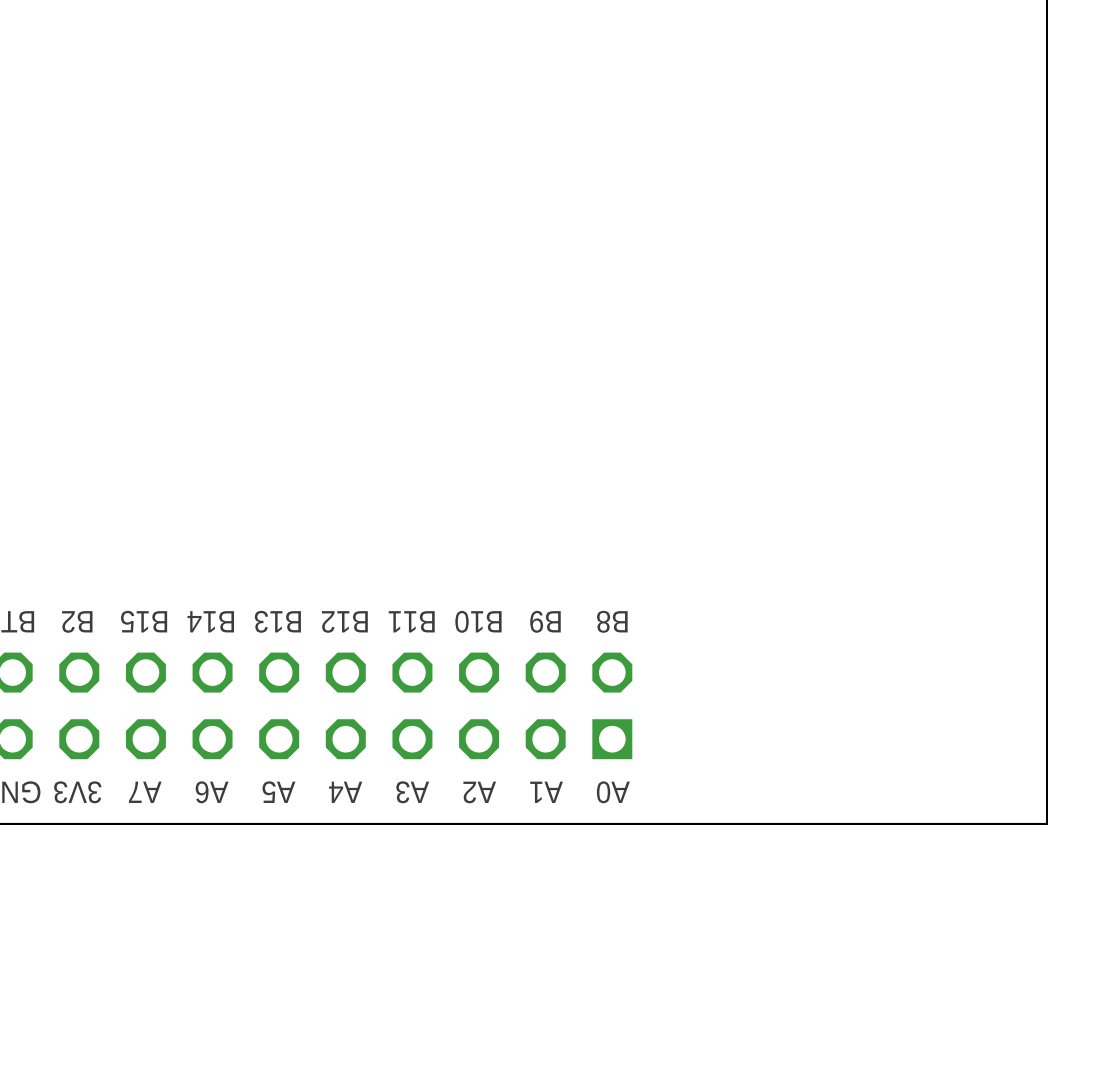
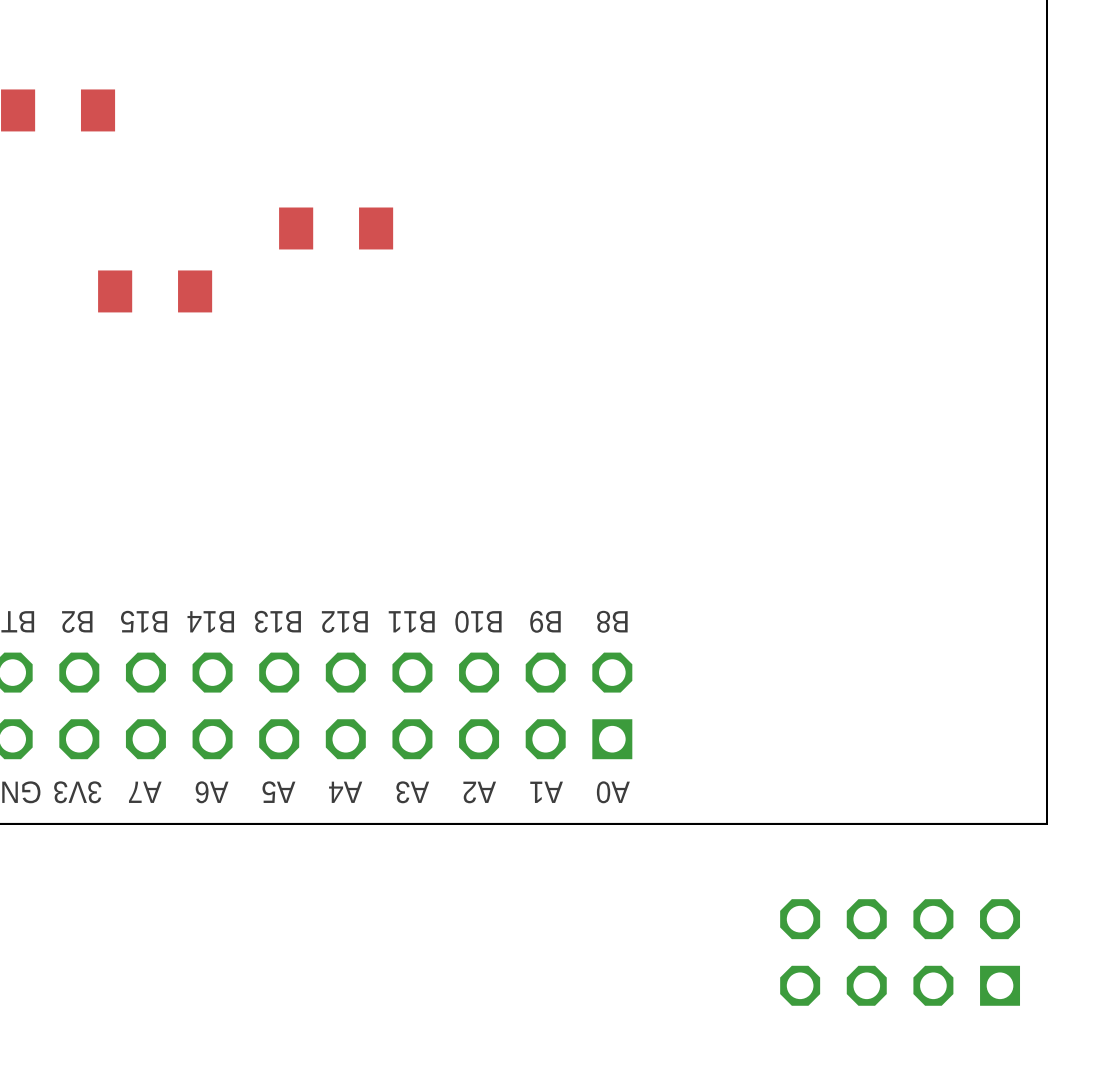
part: none -> (58, 110)
part: none -> (336, 228)
part: none -> (155, 291)
part: none -> (900, 952)

